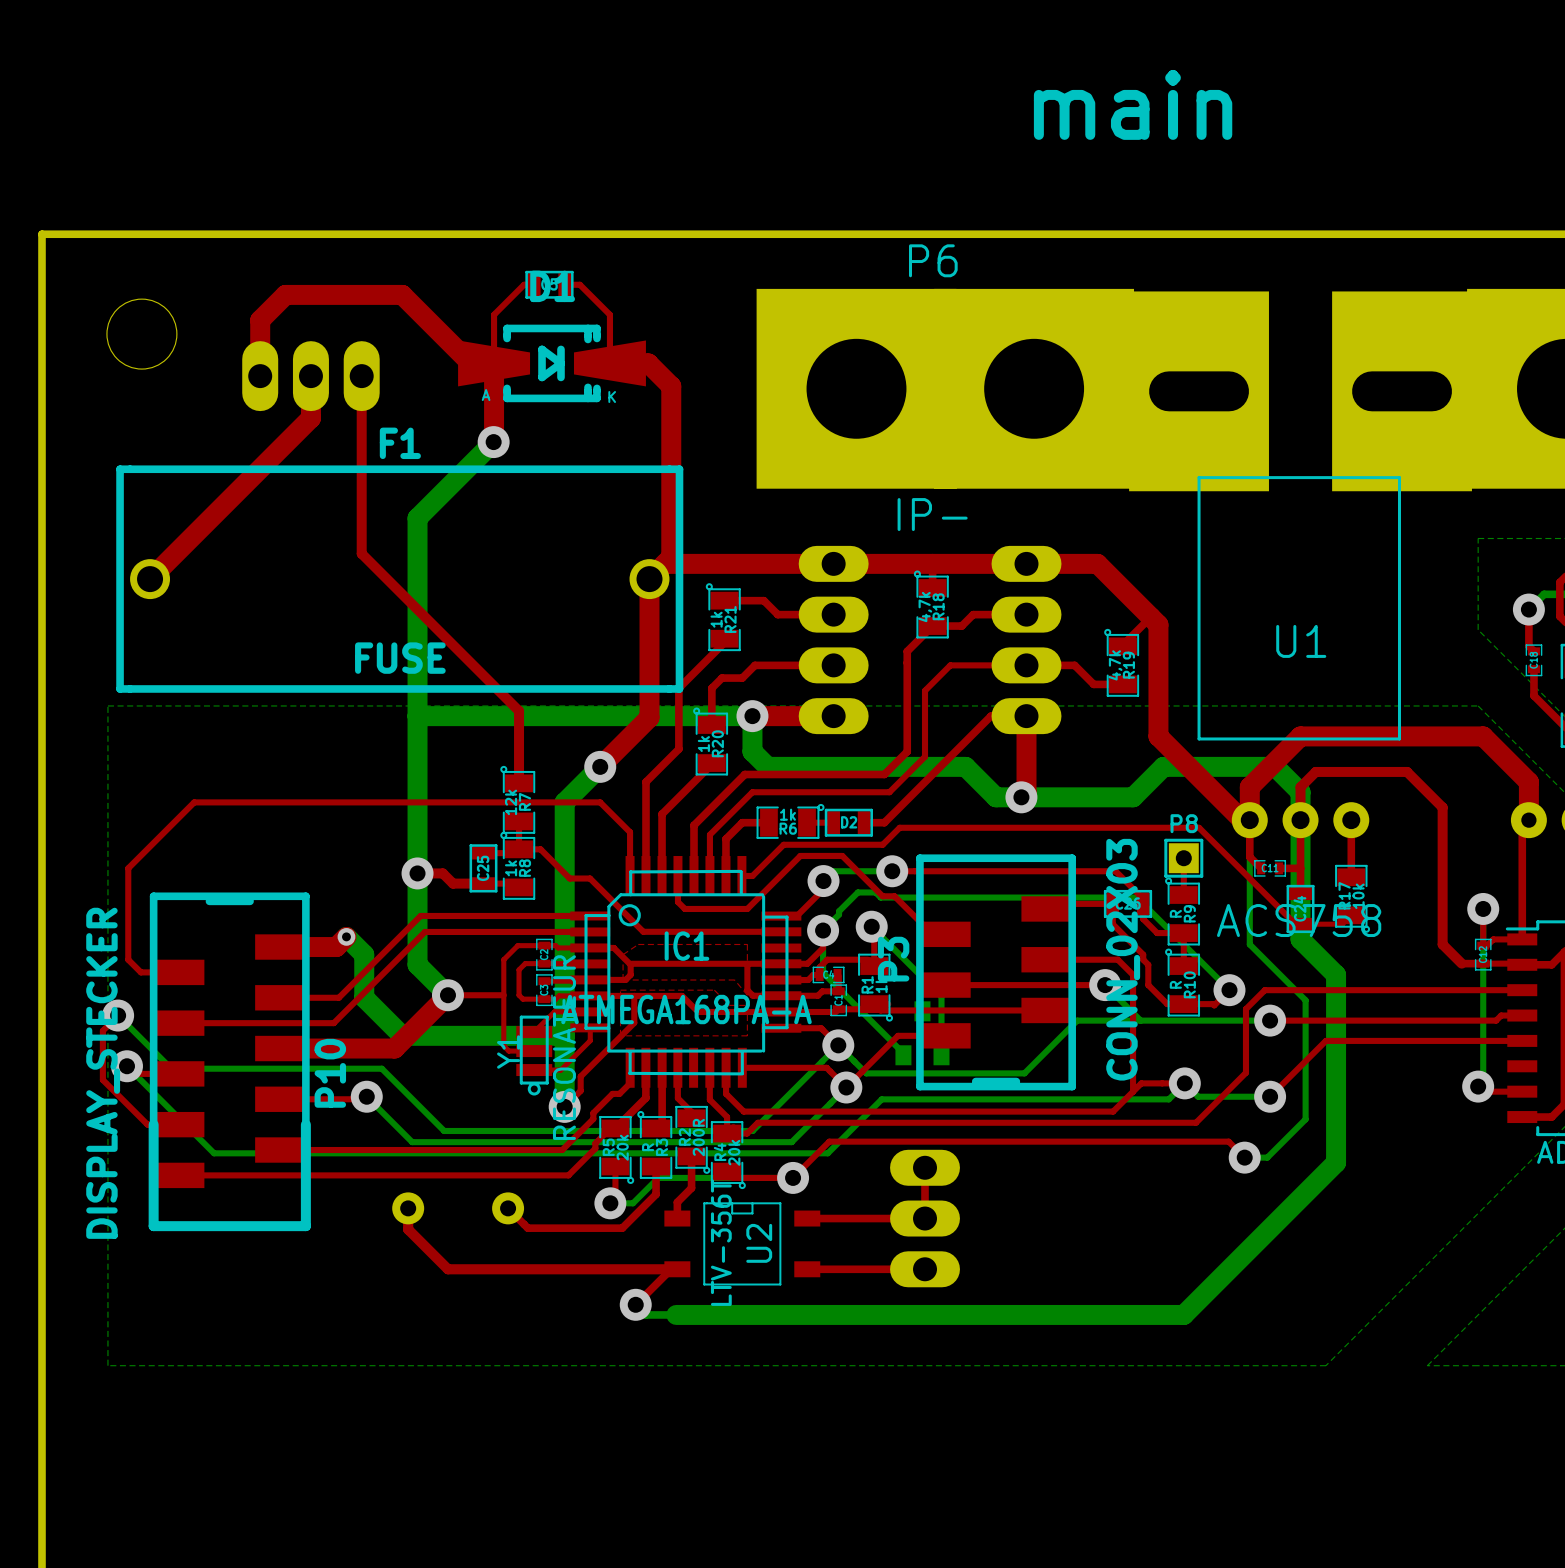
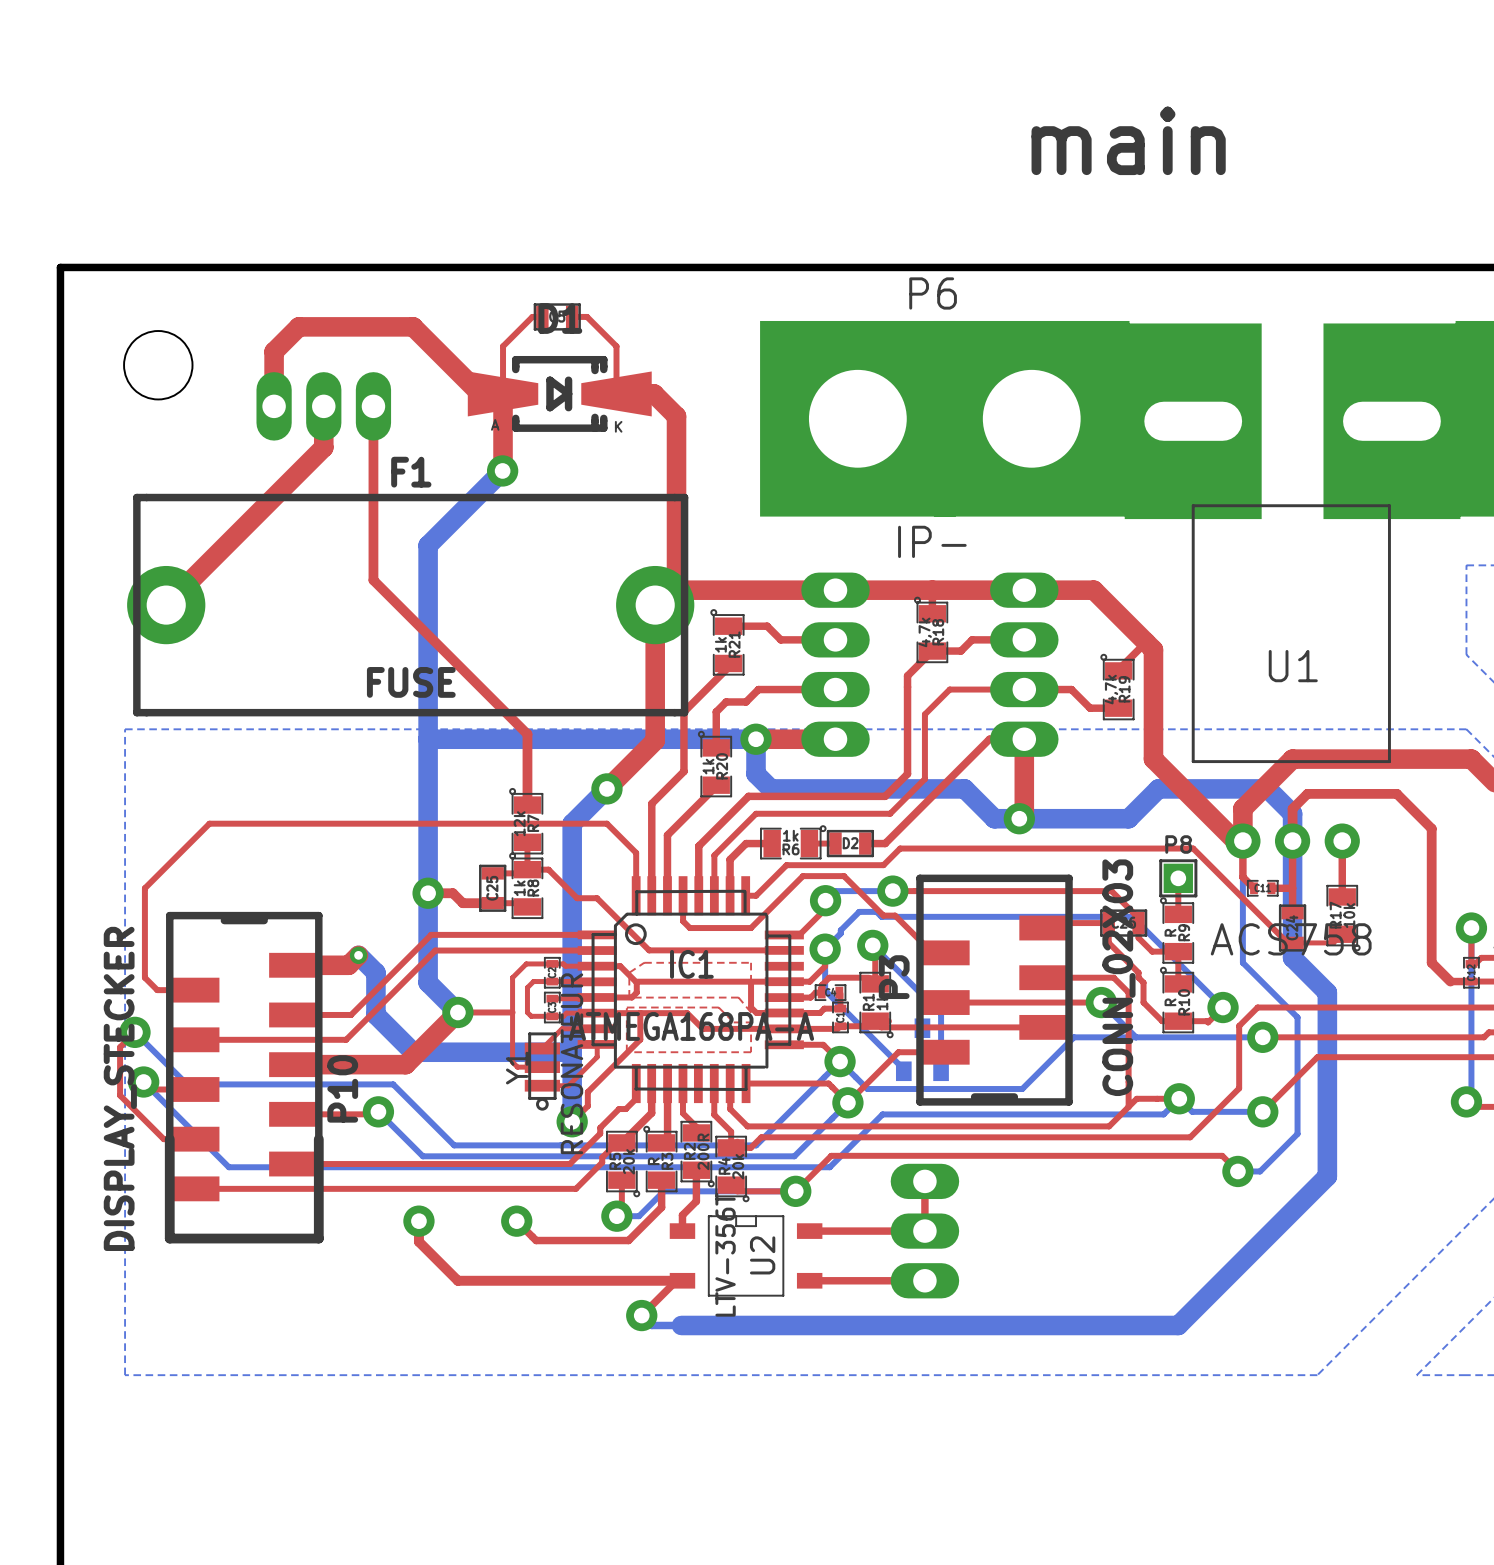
F1 footprint: [116, 465, 684, 693] -> [127, 493, 695, 717]

